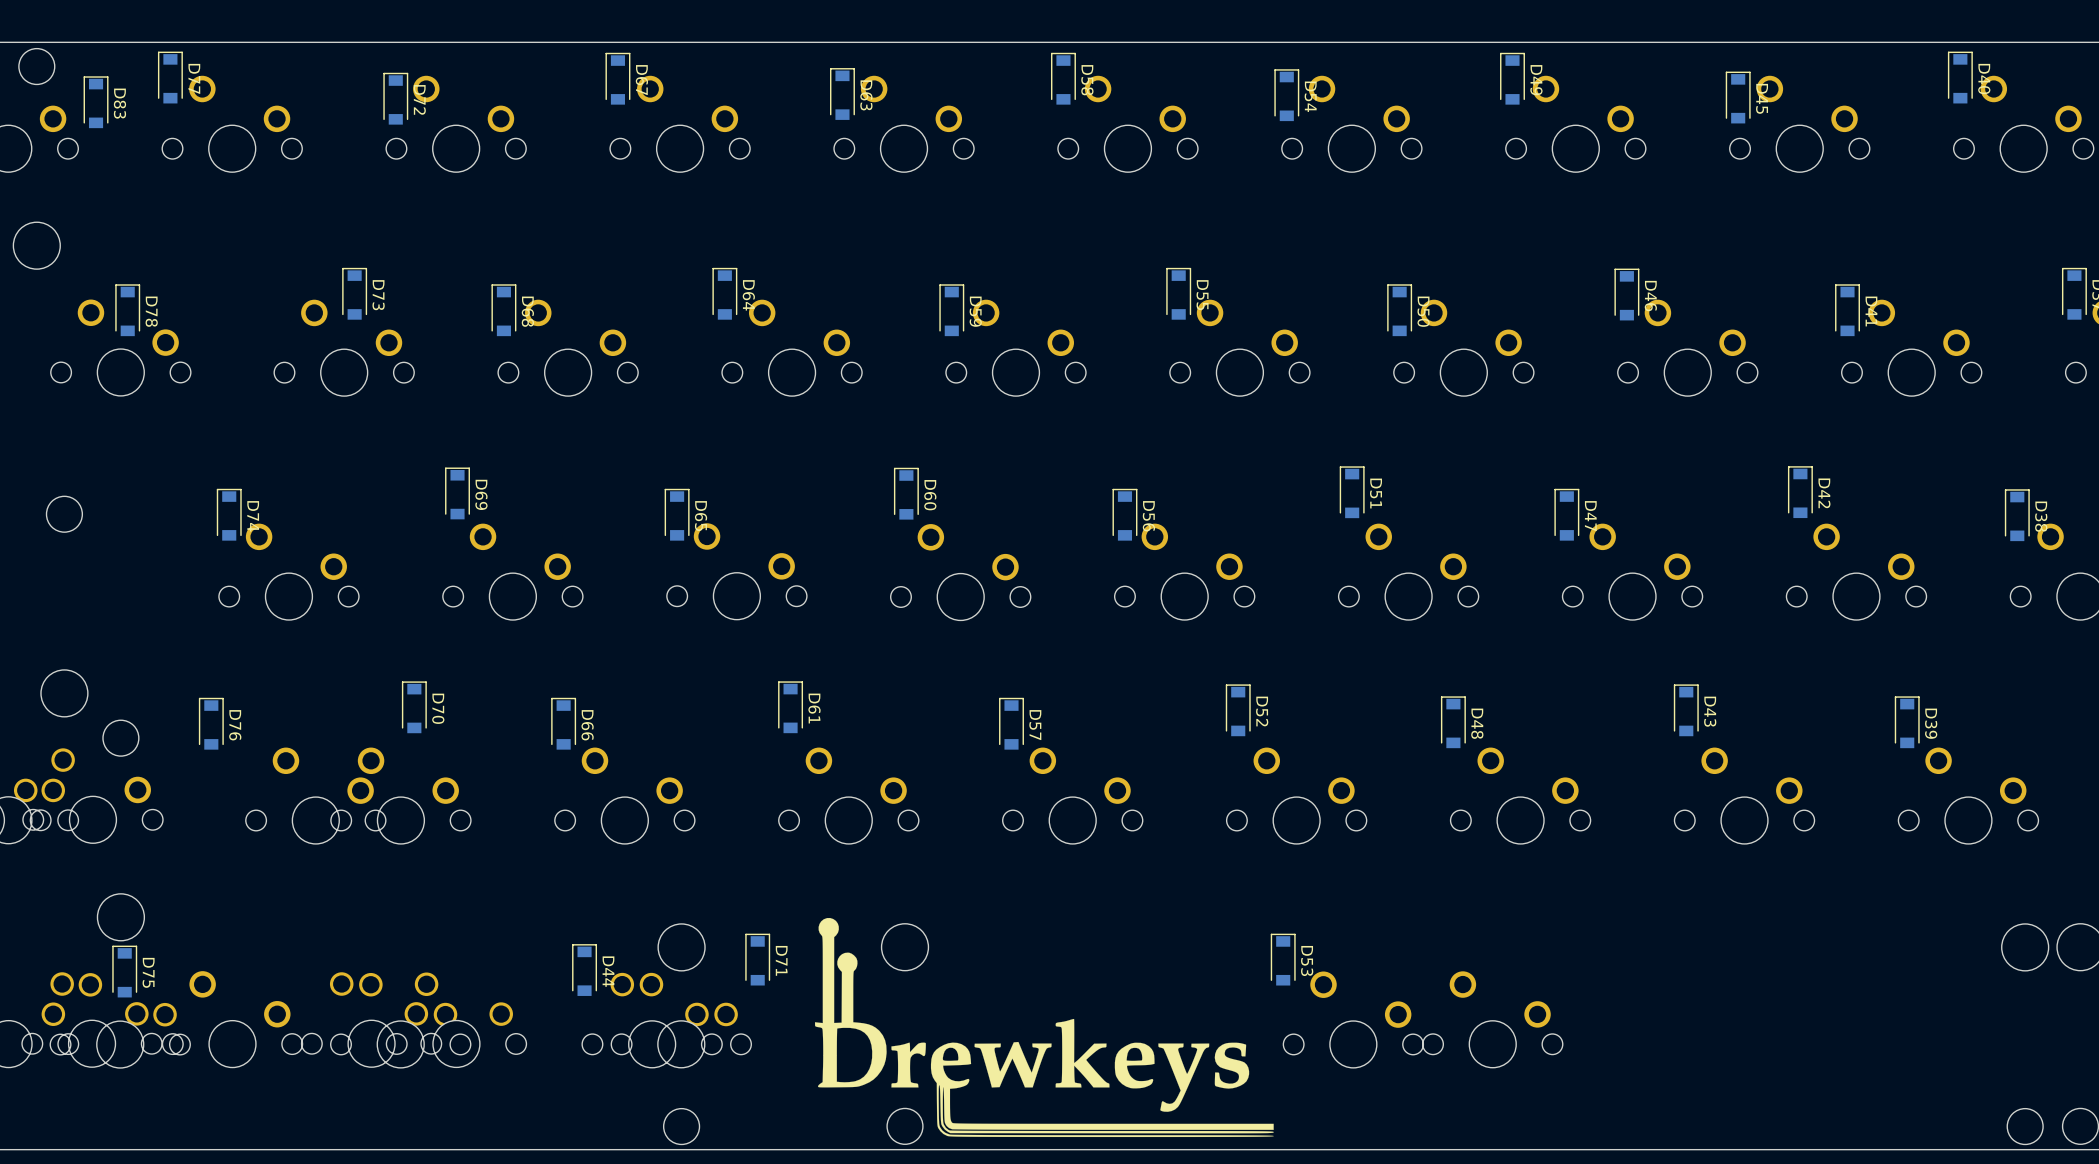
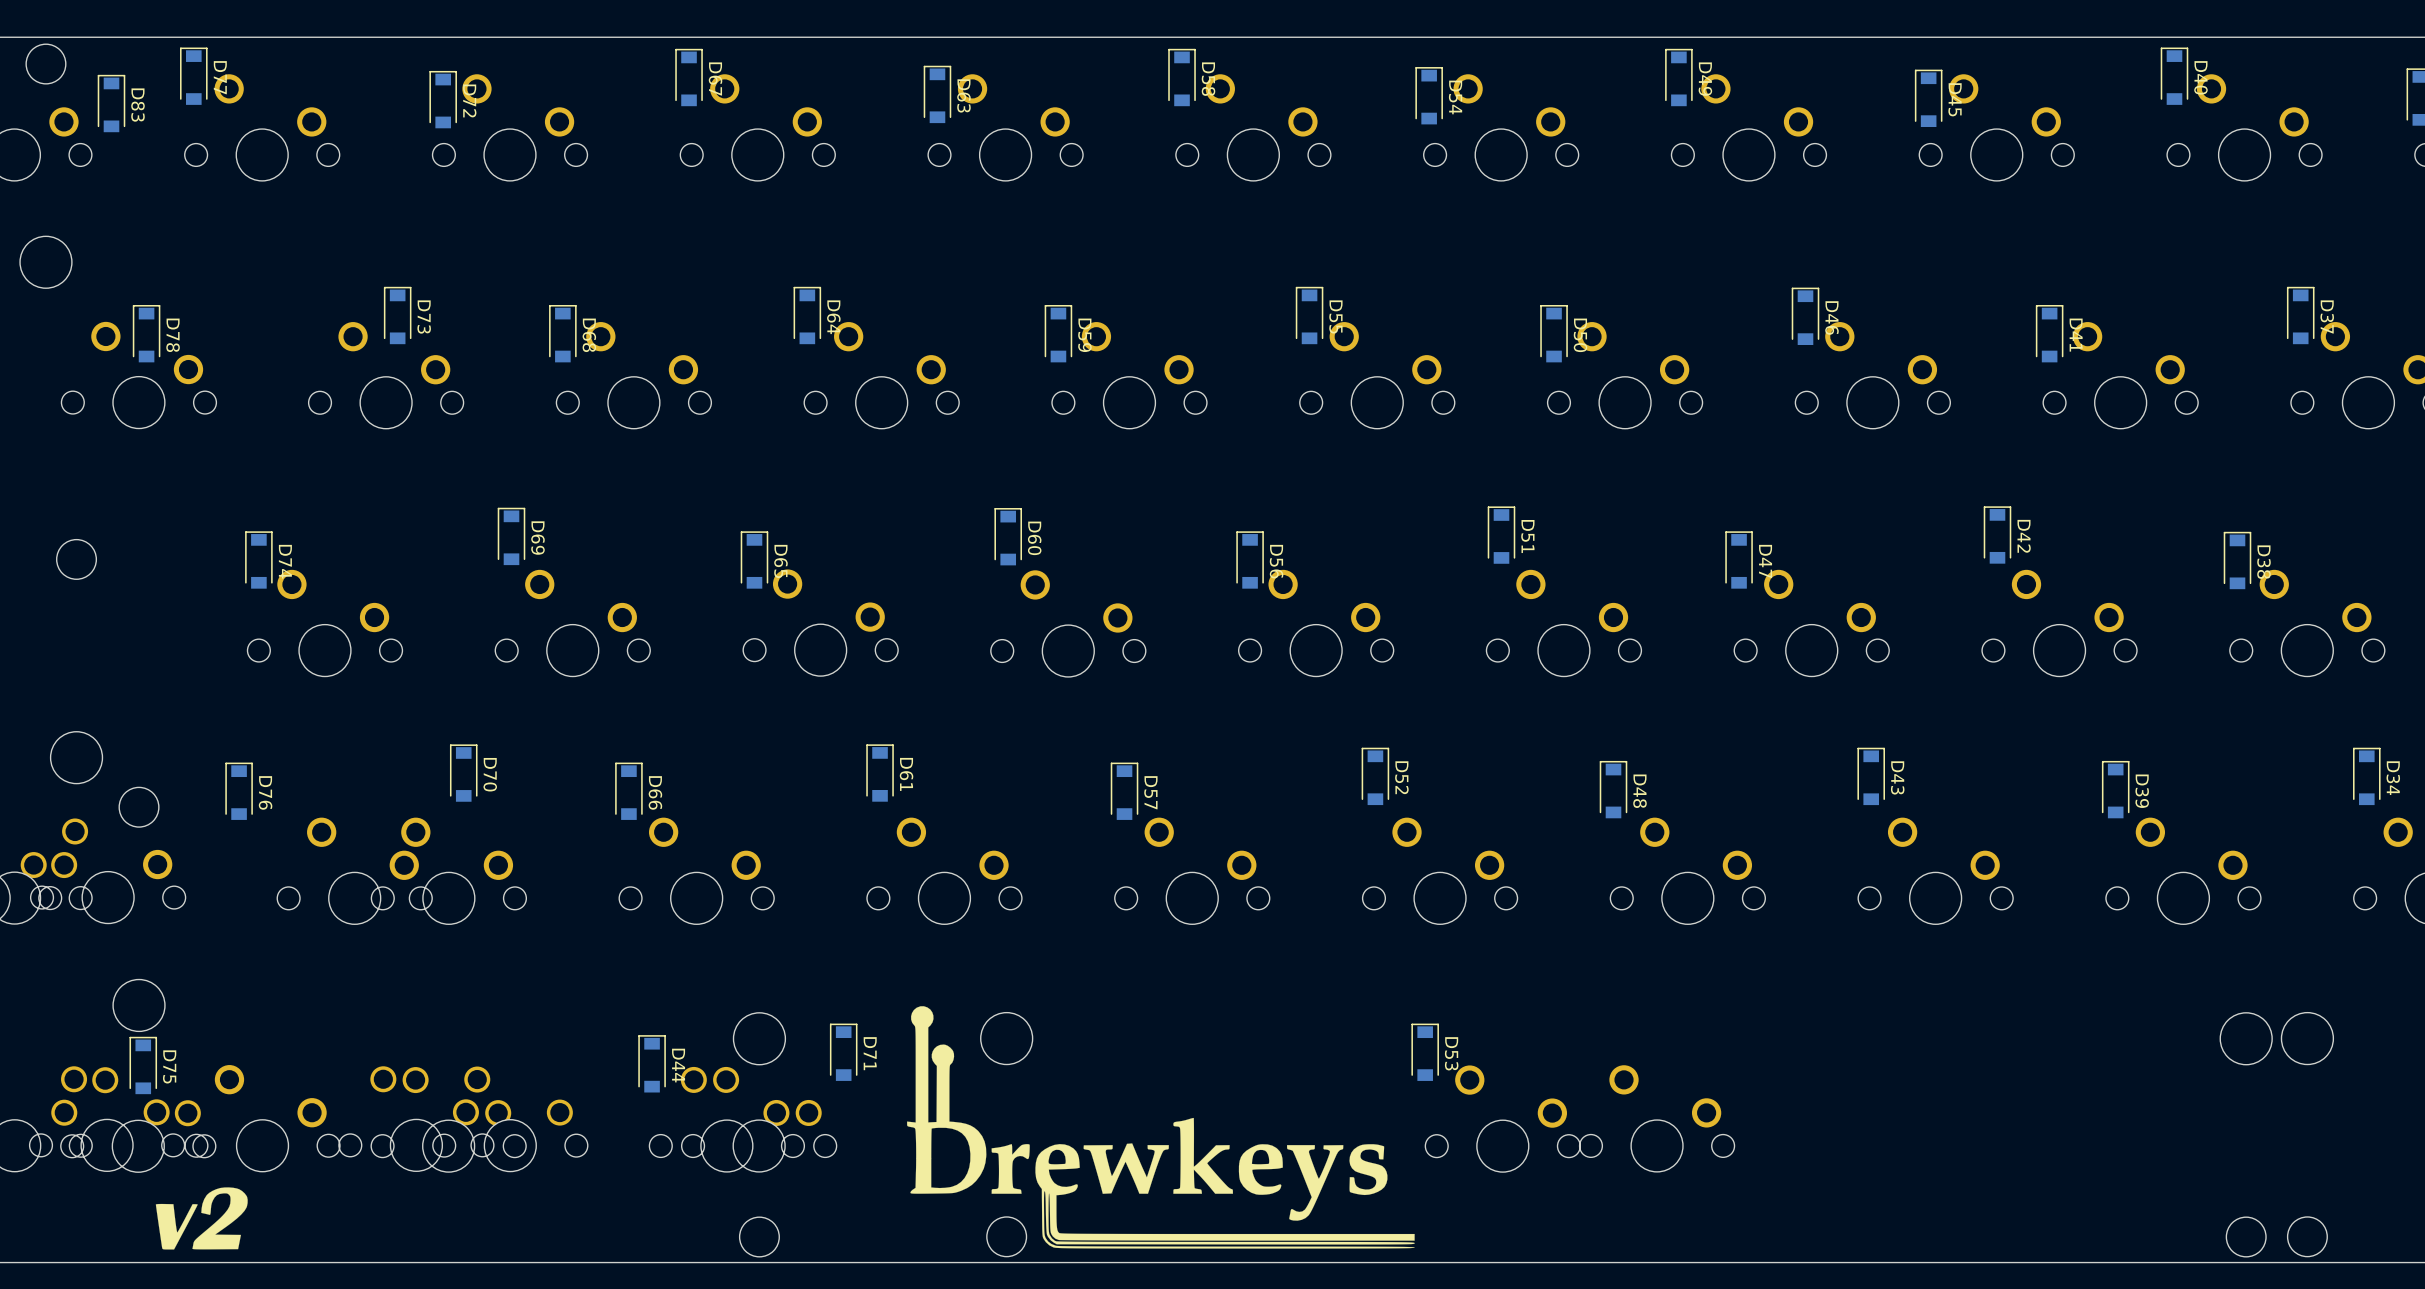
drawing: none -> [155, 1187, 248, 1250]

